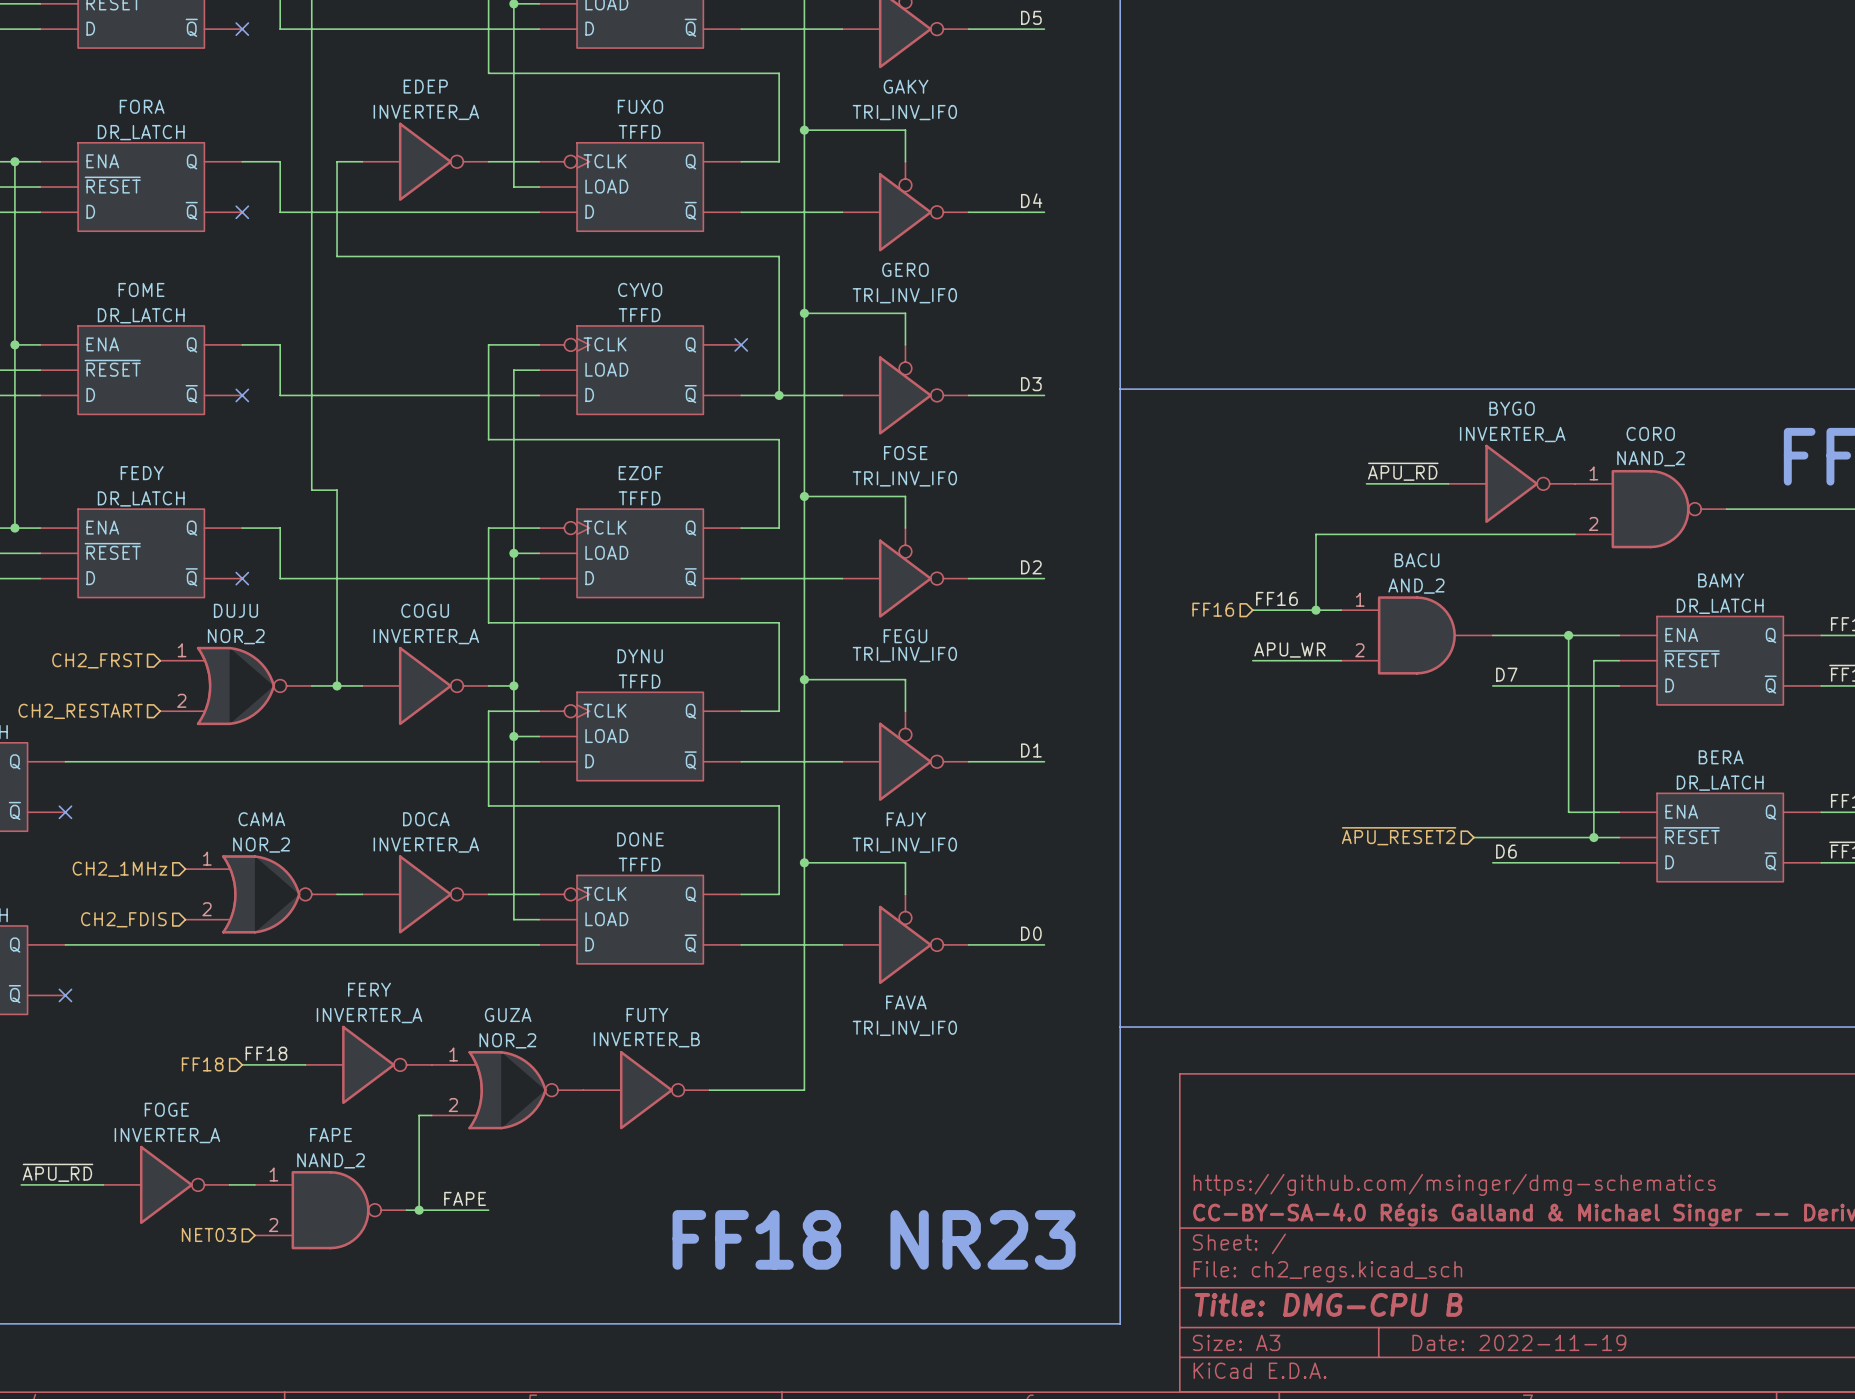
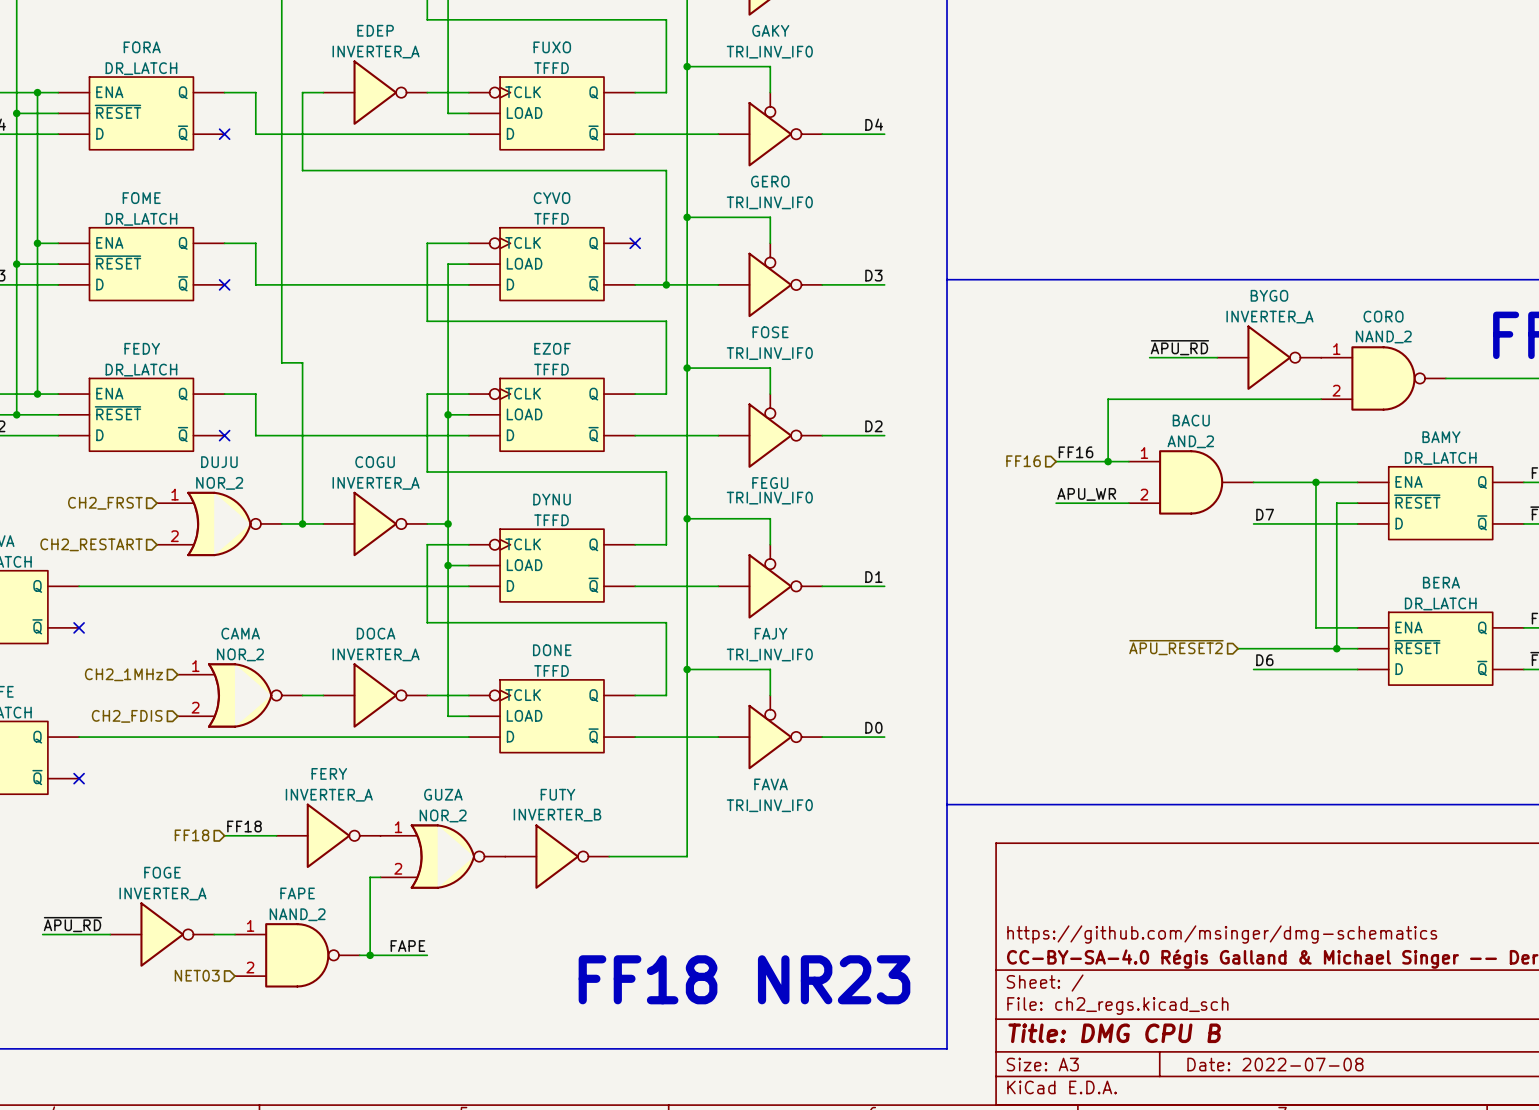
title block: Title: DMG-CPU B (1328, 1304) -> Title: DMG CPU B (1114, 1033)
title block: Date: 2022-11-19 (1519, 1342) -> Date: 2022-07-08 (1275, 1064)

